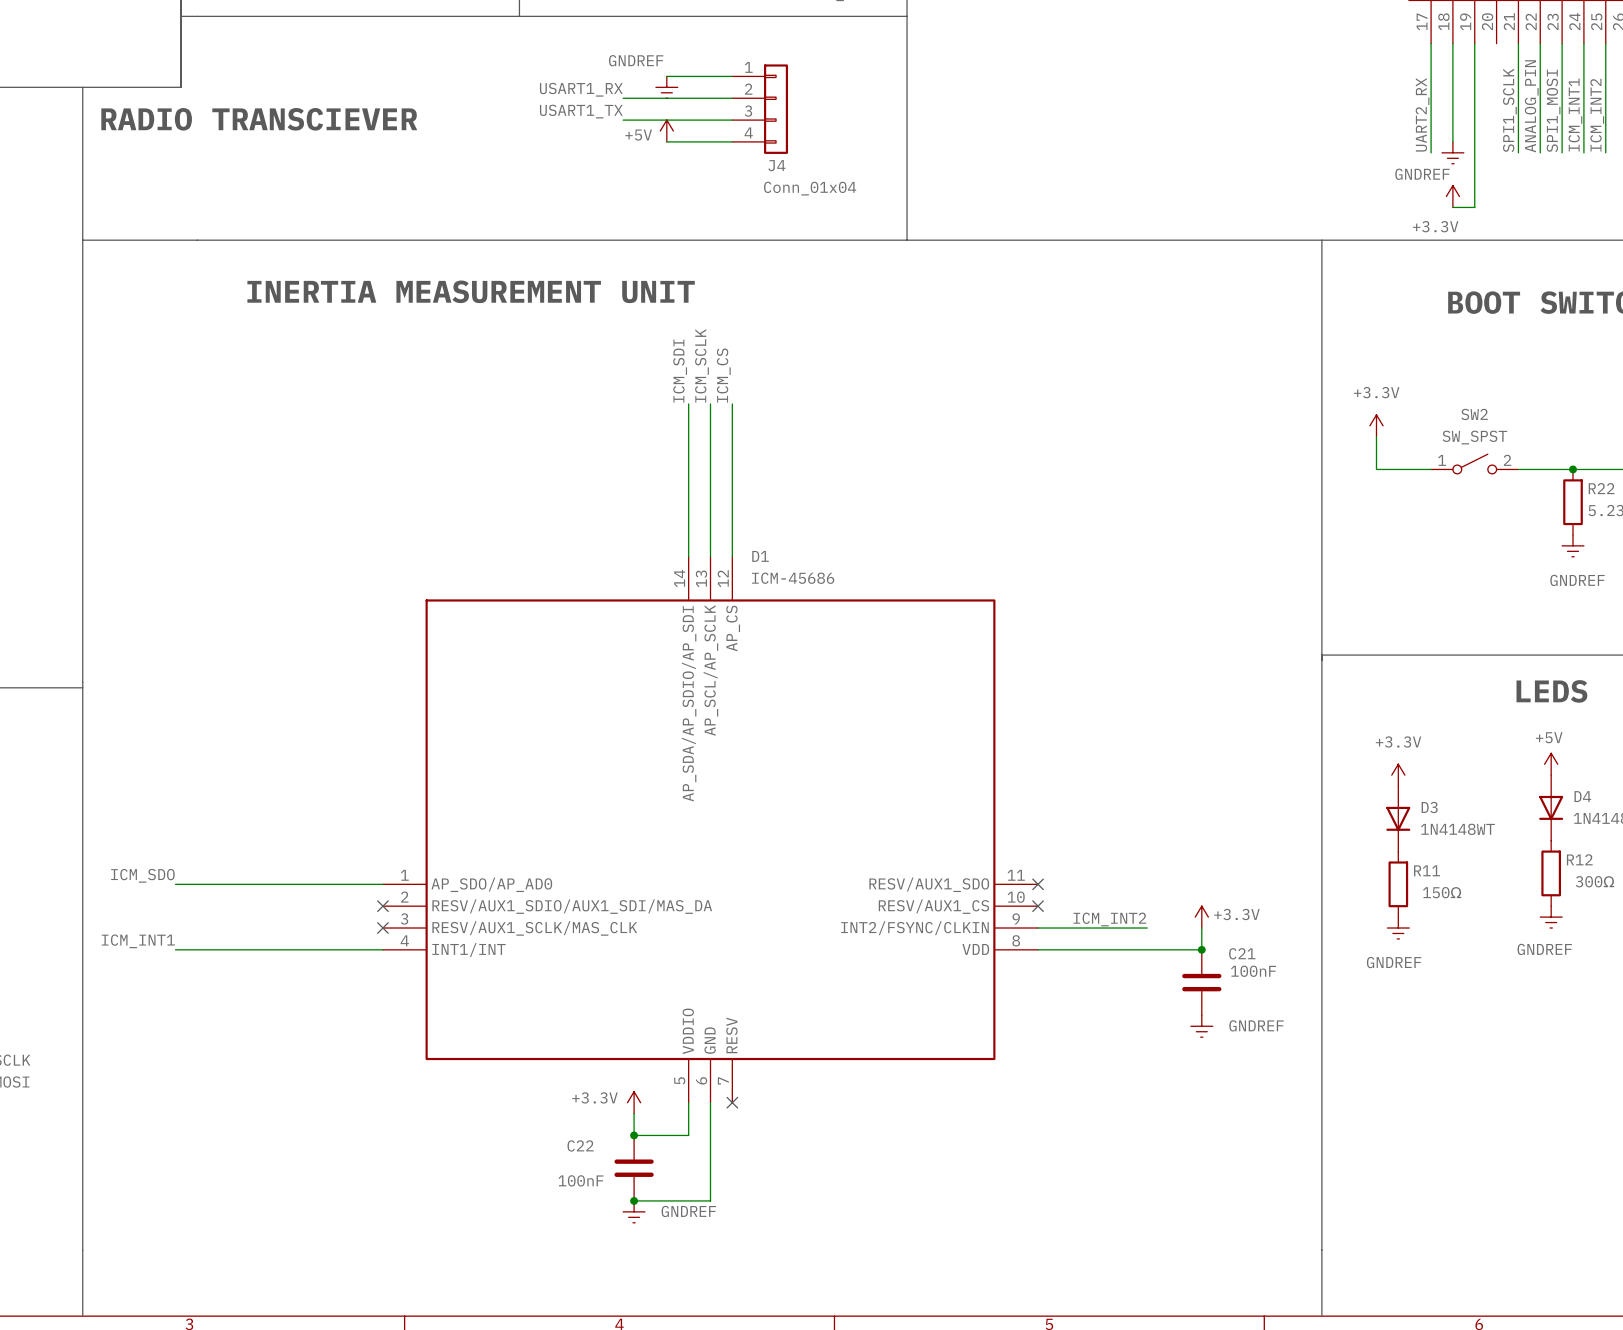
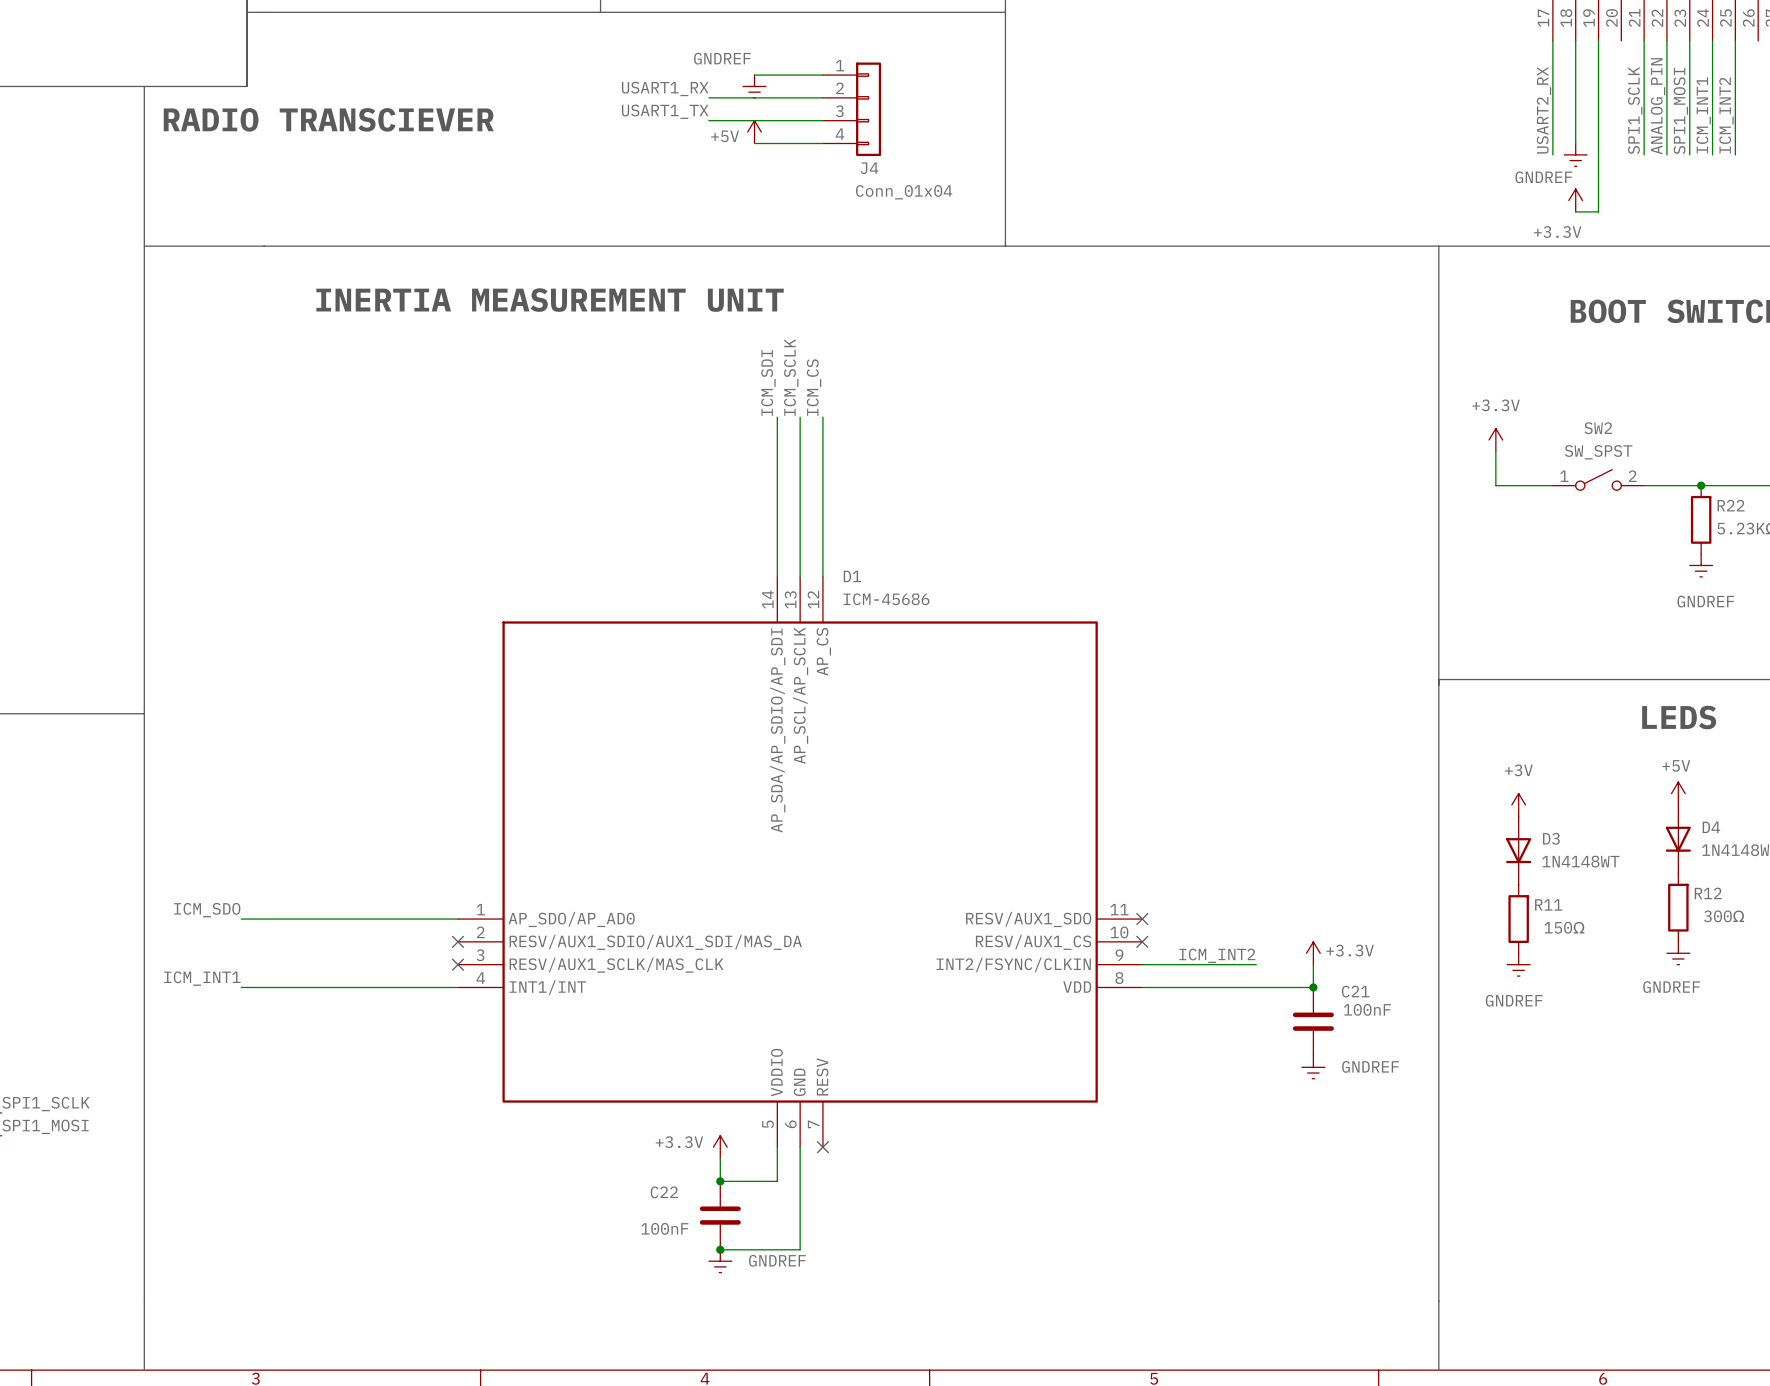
label: UART2_RX (1422, 114) -> USART2_RX (1543, 110)
power symbol: +3.3V (1398, 775) -> +3V (1518, 804)

